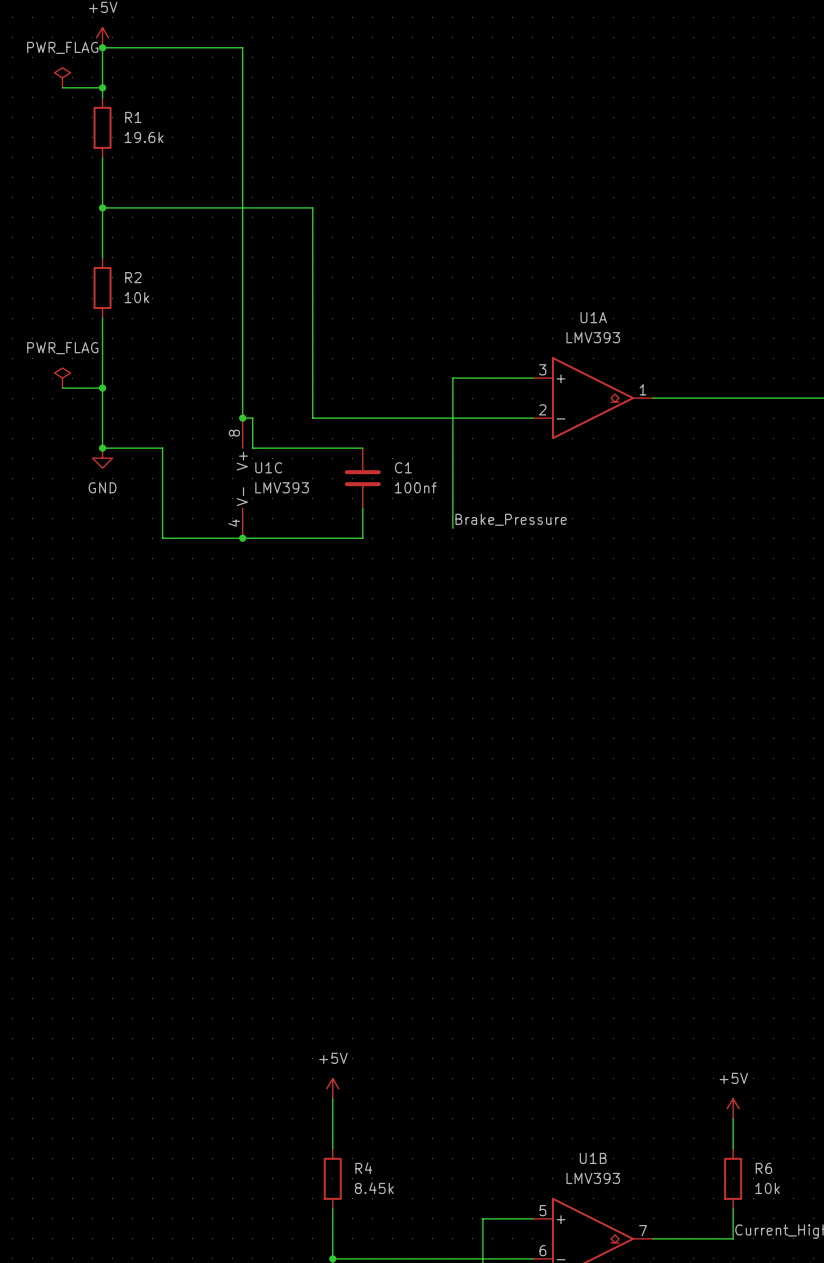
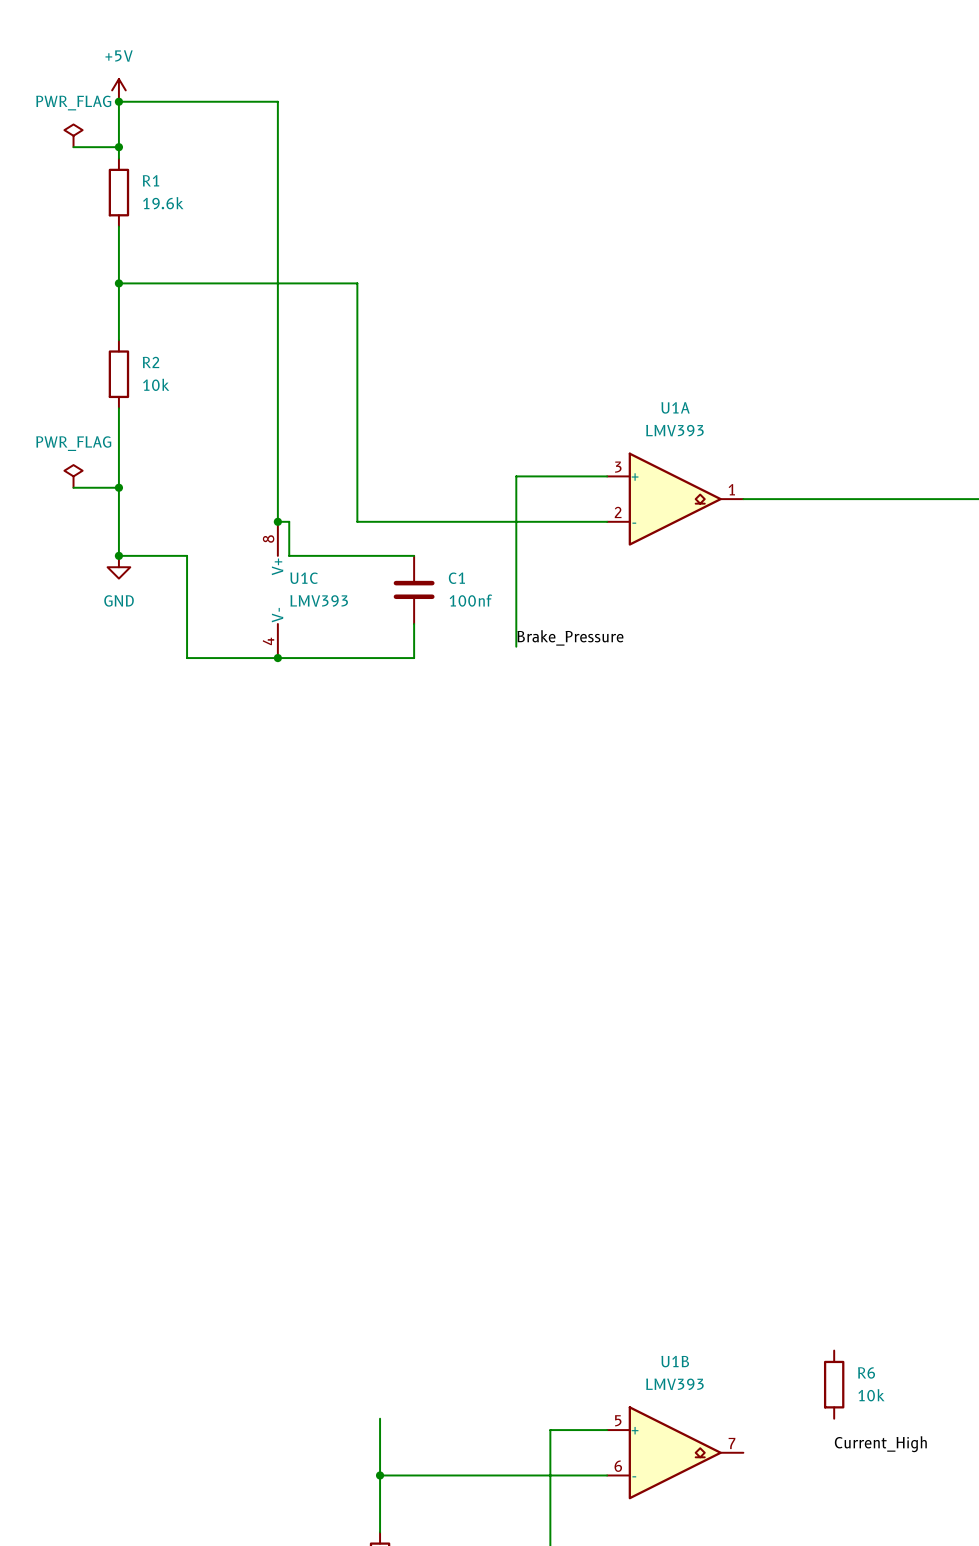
power symbol: +5V (332, 1088) -> none
wire: (332, 1098) (332, 1148) -> none
power symbol: +5V (733, 1108) -> none
wire: (733, 1118) (733, 1148) -> none
R4: 8.45k (332, 1178) -> none
wire: (733, 1208) (733, 1238) (653, 1238) -> none

